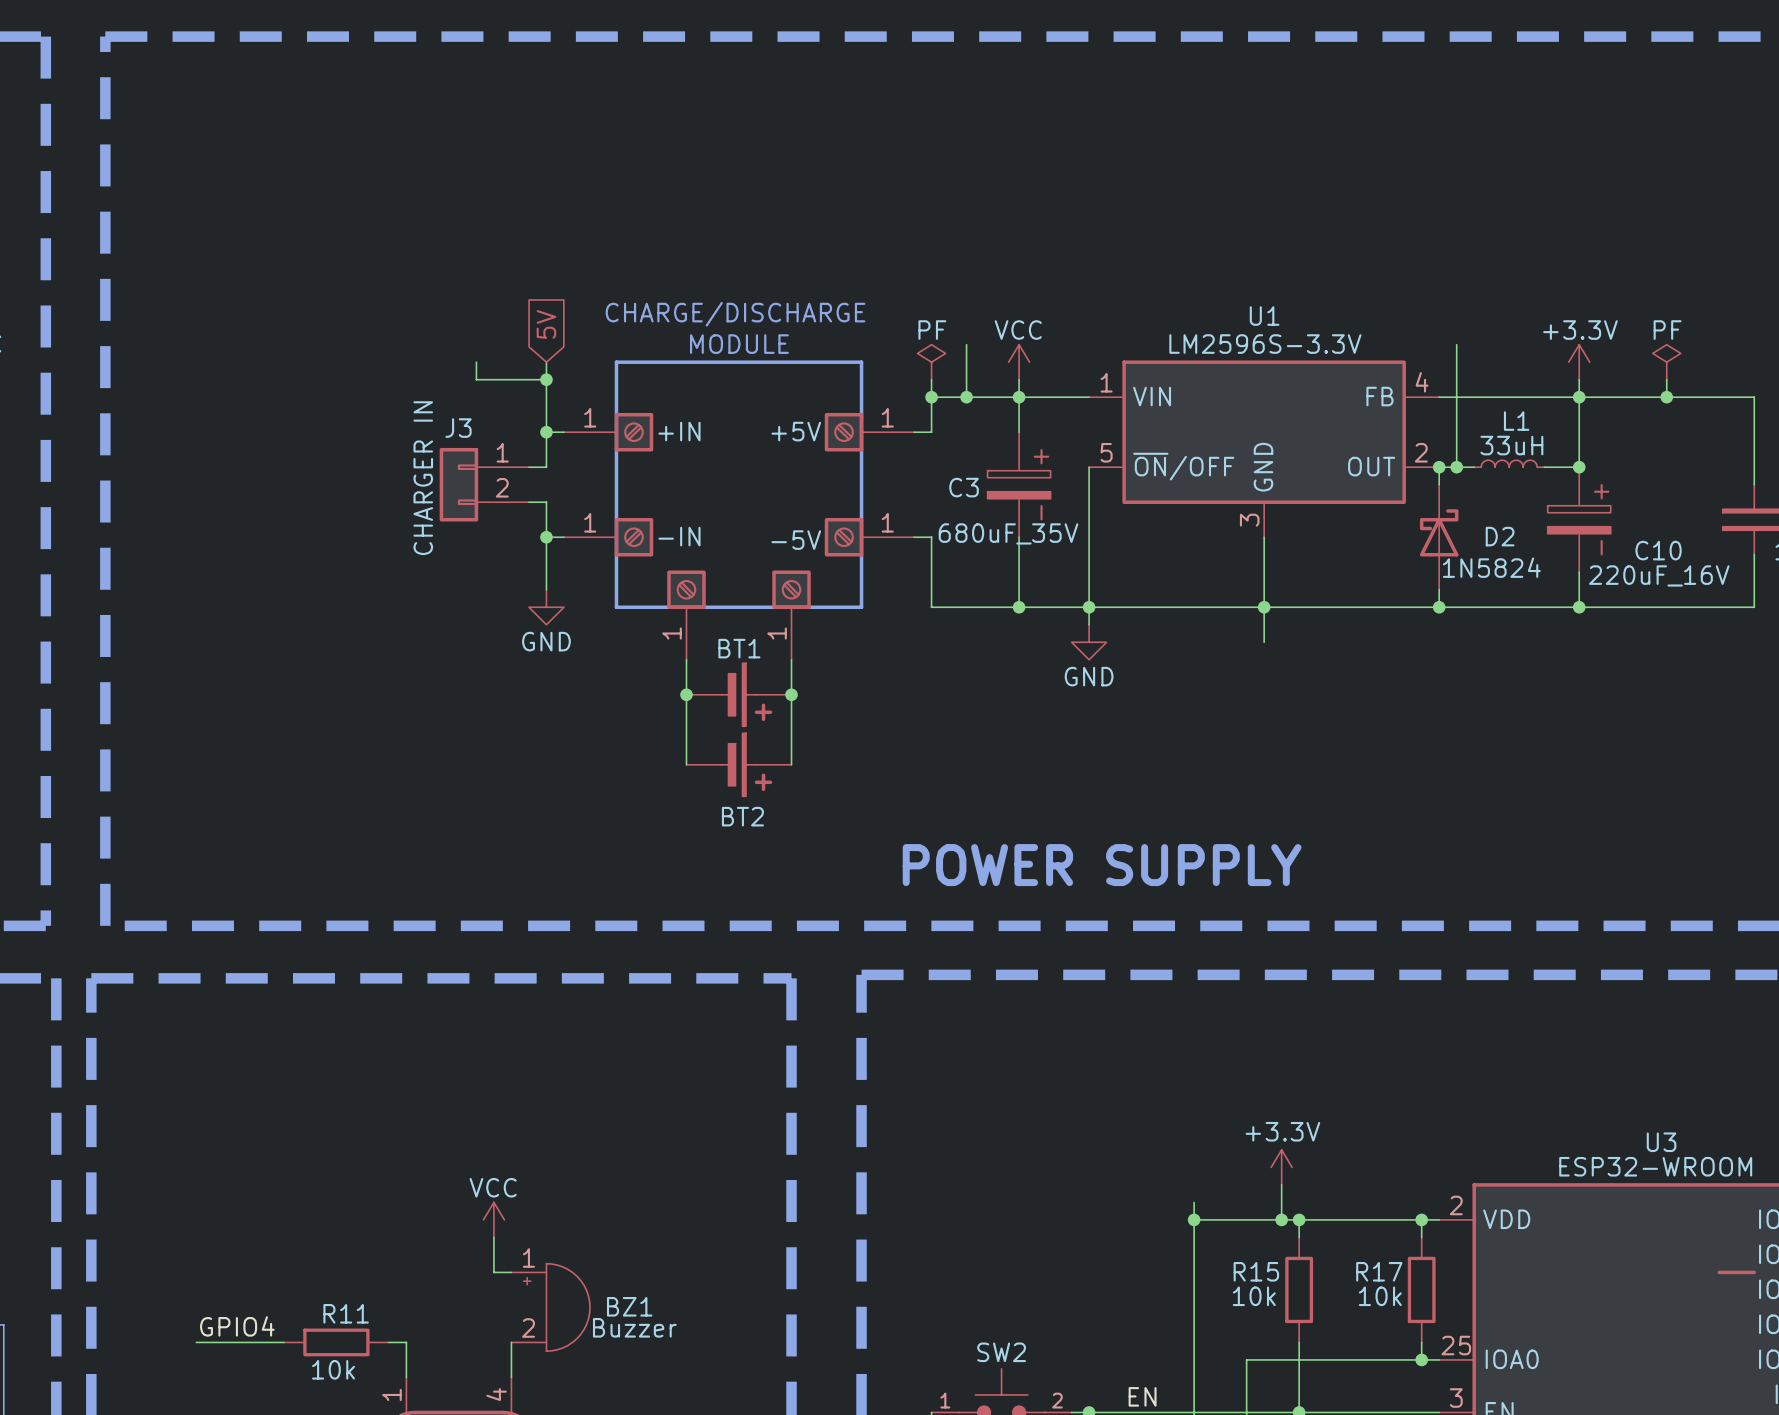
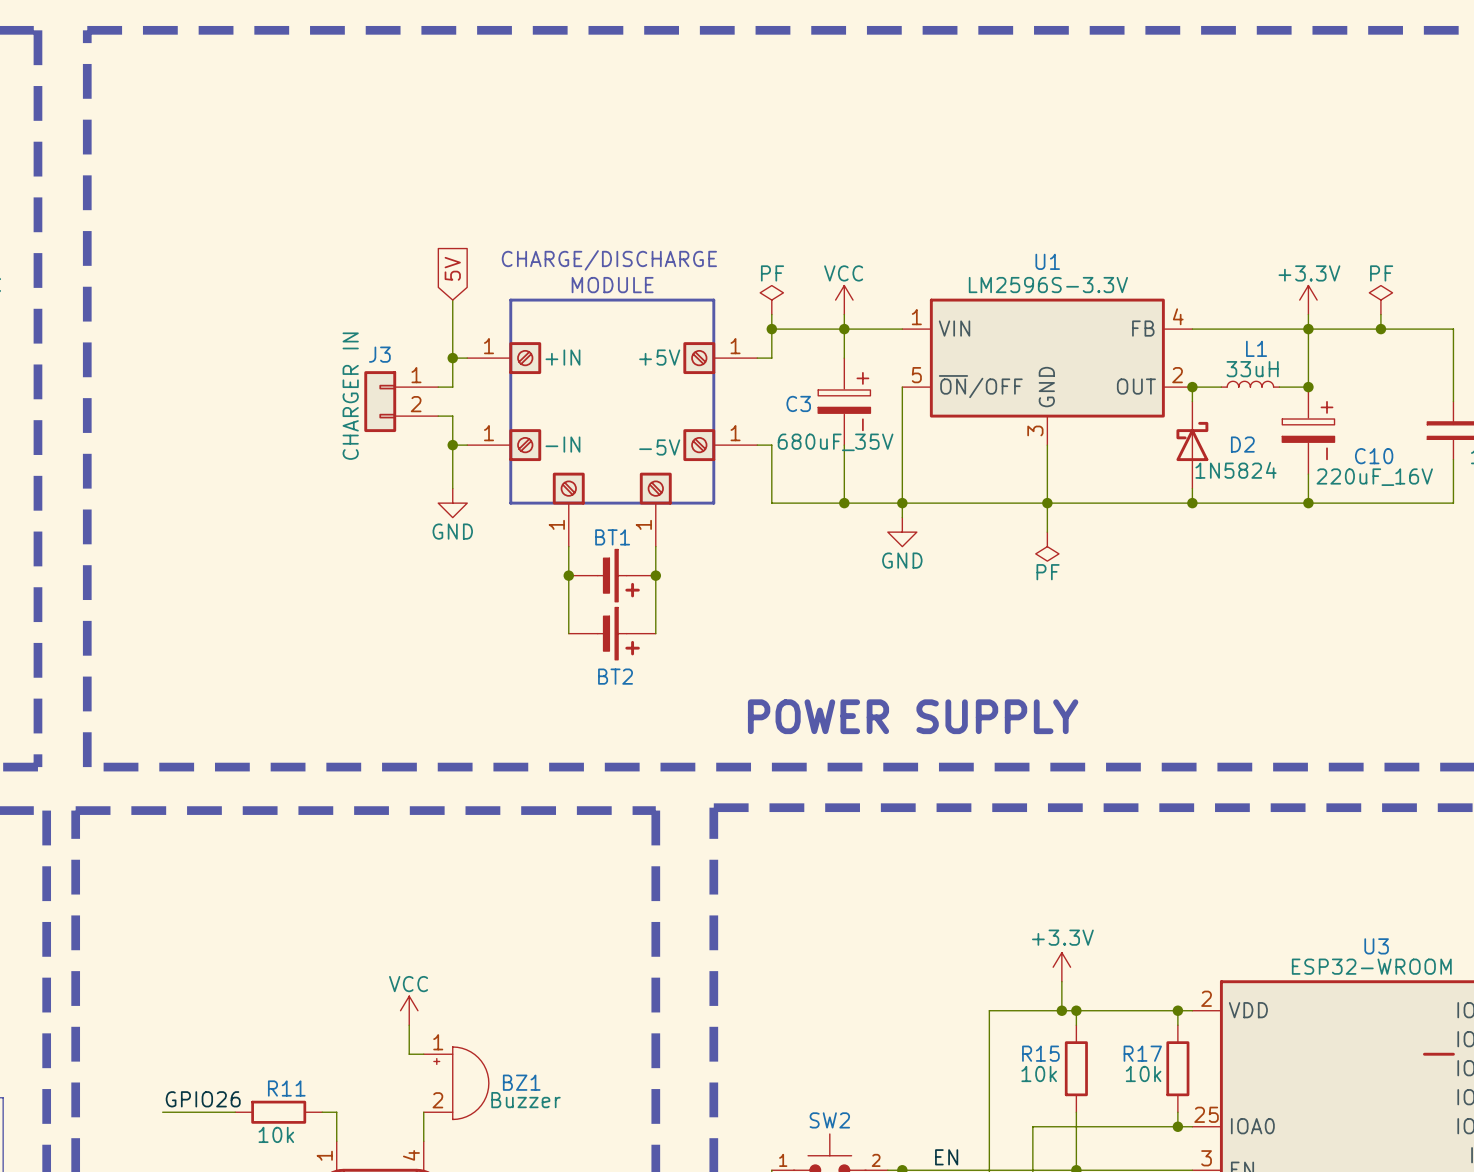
wire: (966, 344) (966, 397) -> none
wire: (1456, 344) (1456, 467) -> none
wire: (476, 362) (476, 379) (546, 379) -> none
junction: (546, 379) -> none
junction: (966, 397) -> none
junction: (1456, 467) -> none
power symbol: none -> PF (1047, 546)
wire: (1194, 1202) (1194, 1219) -> none
junction: (1194, 1219) -> none
label: GPIO4 (237, 1326) -> GPIO26 (203, 1099)

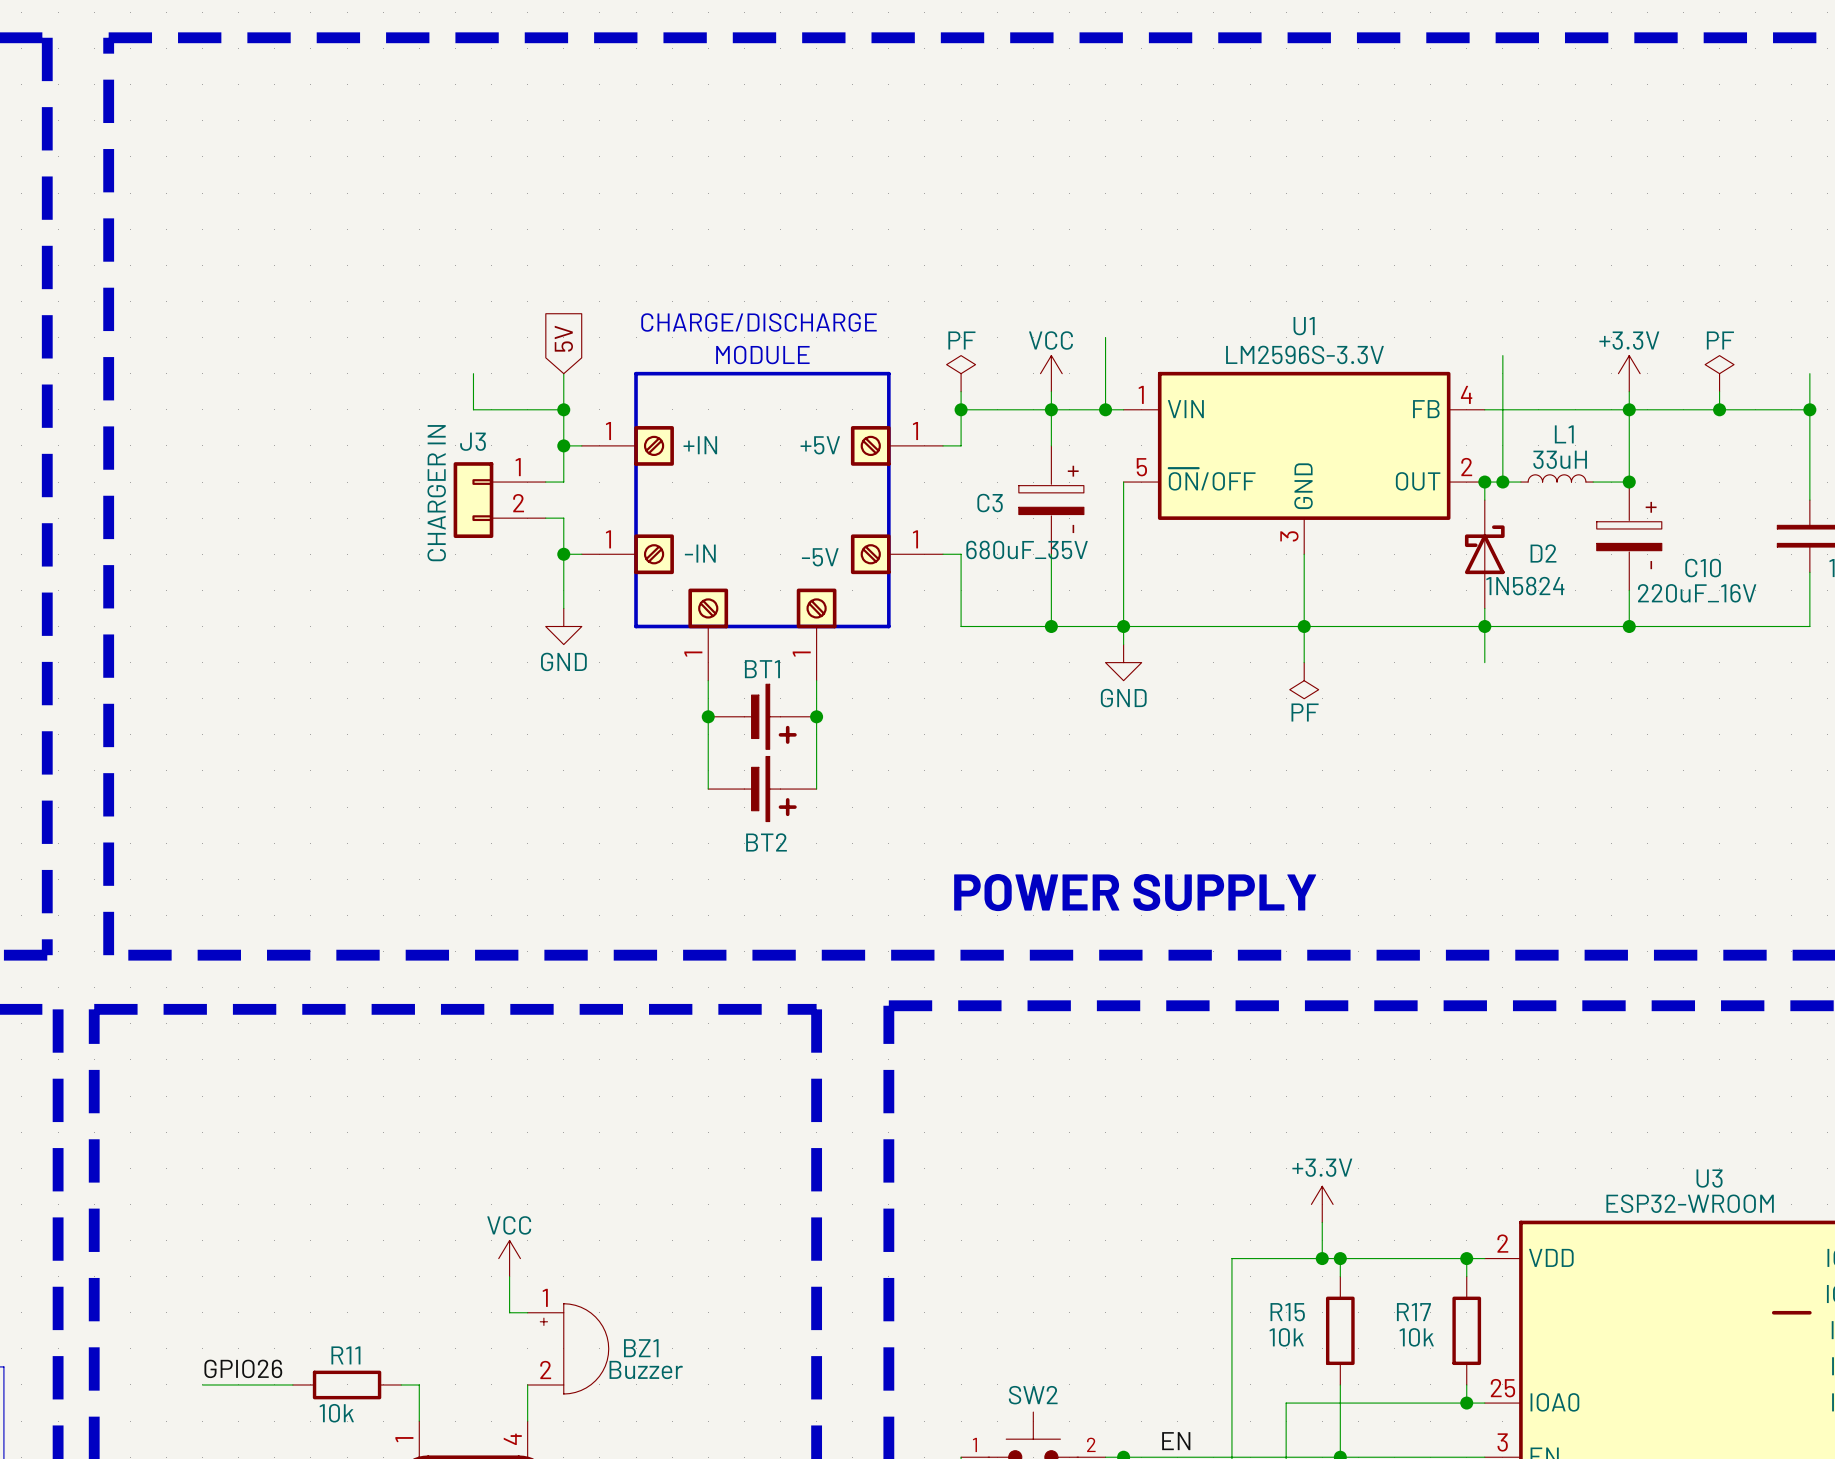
wire: none -> (1105, 337) (1105, 409)
wire: none -> (1502, 355) (1502, 482)
wire: none -> (473, 373) (473, 409) (563, 409)
wire: none -> (1809, 373) (1809, 409)
junction: none -> (563, 409)
junction: none -> (1105, 409)
junction: none -> (1809, 409)
junction: none -> (1502, 482)
wire: none -> (1484, 626) (1484, 662)

